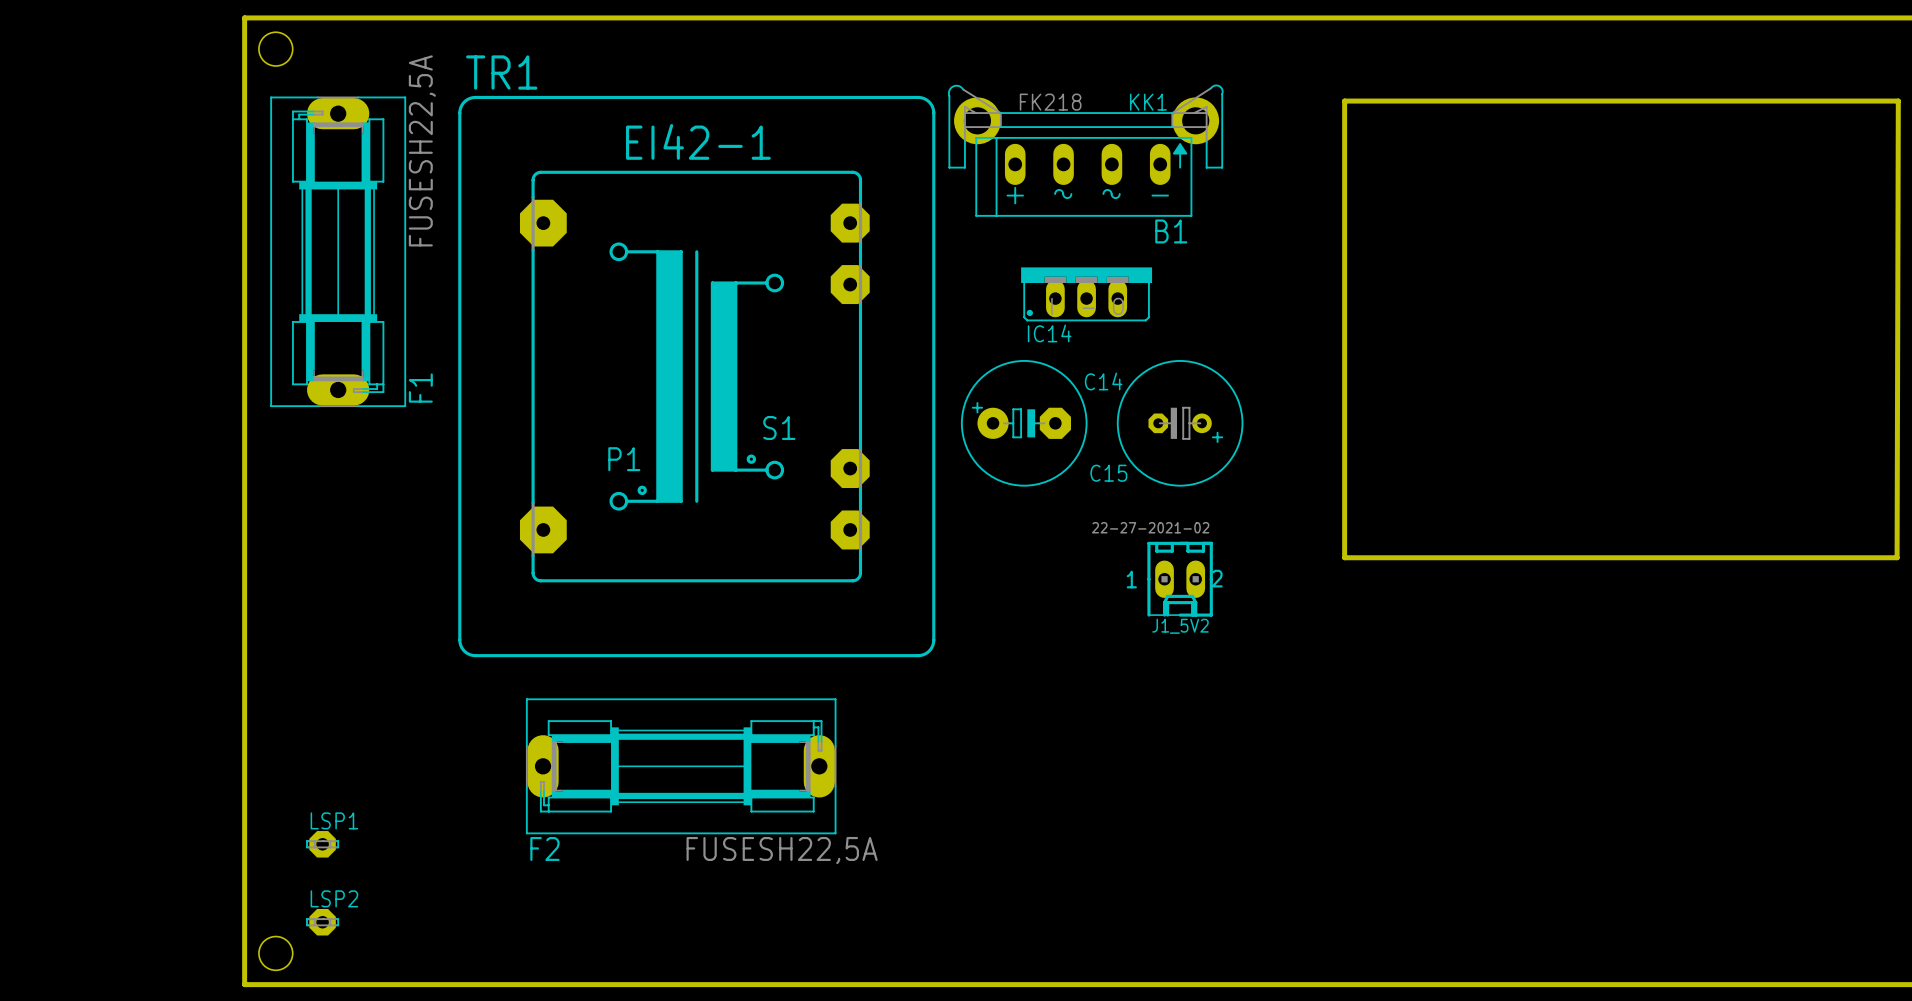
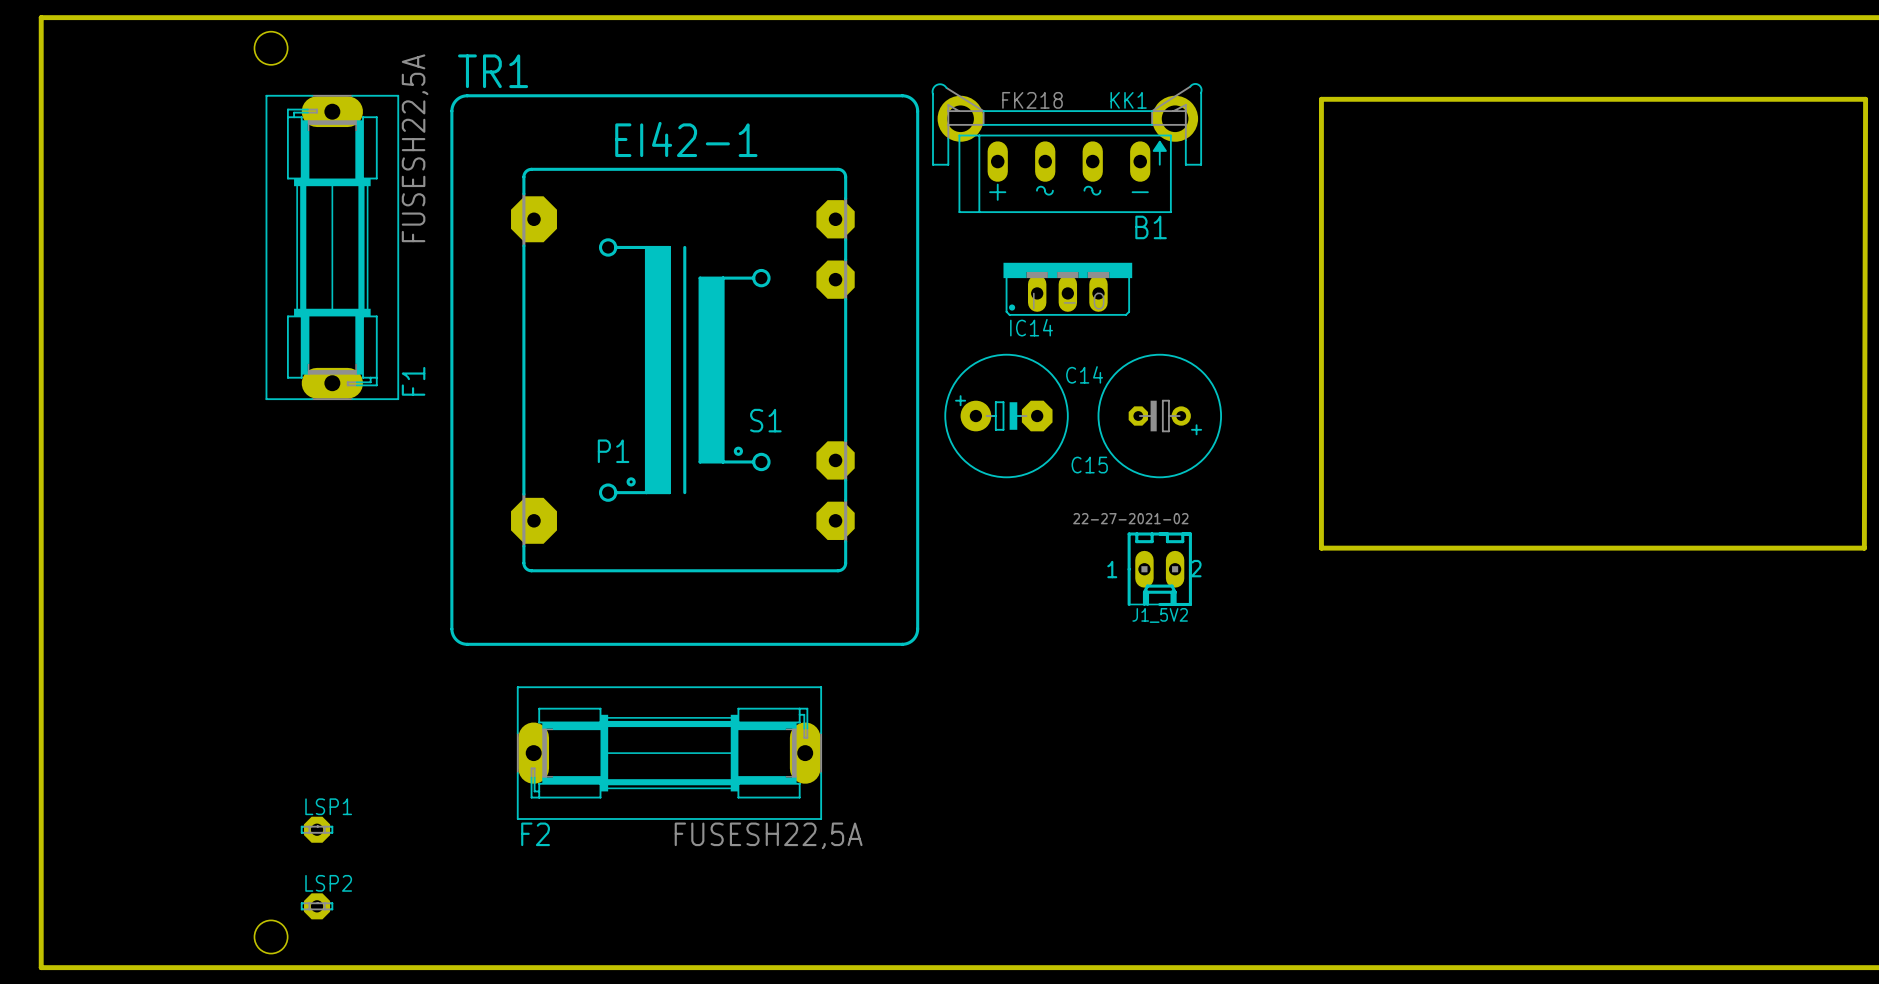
board edge: (244, 17) (244, 984) -> (240, 17) (41, 17) (41, 967) (240, 967)

